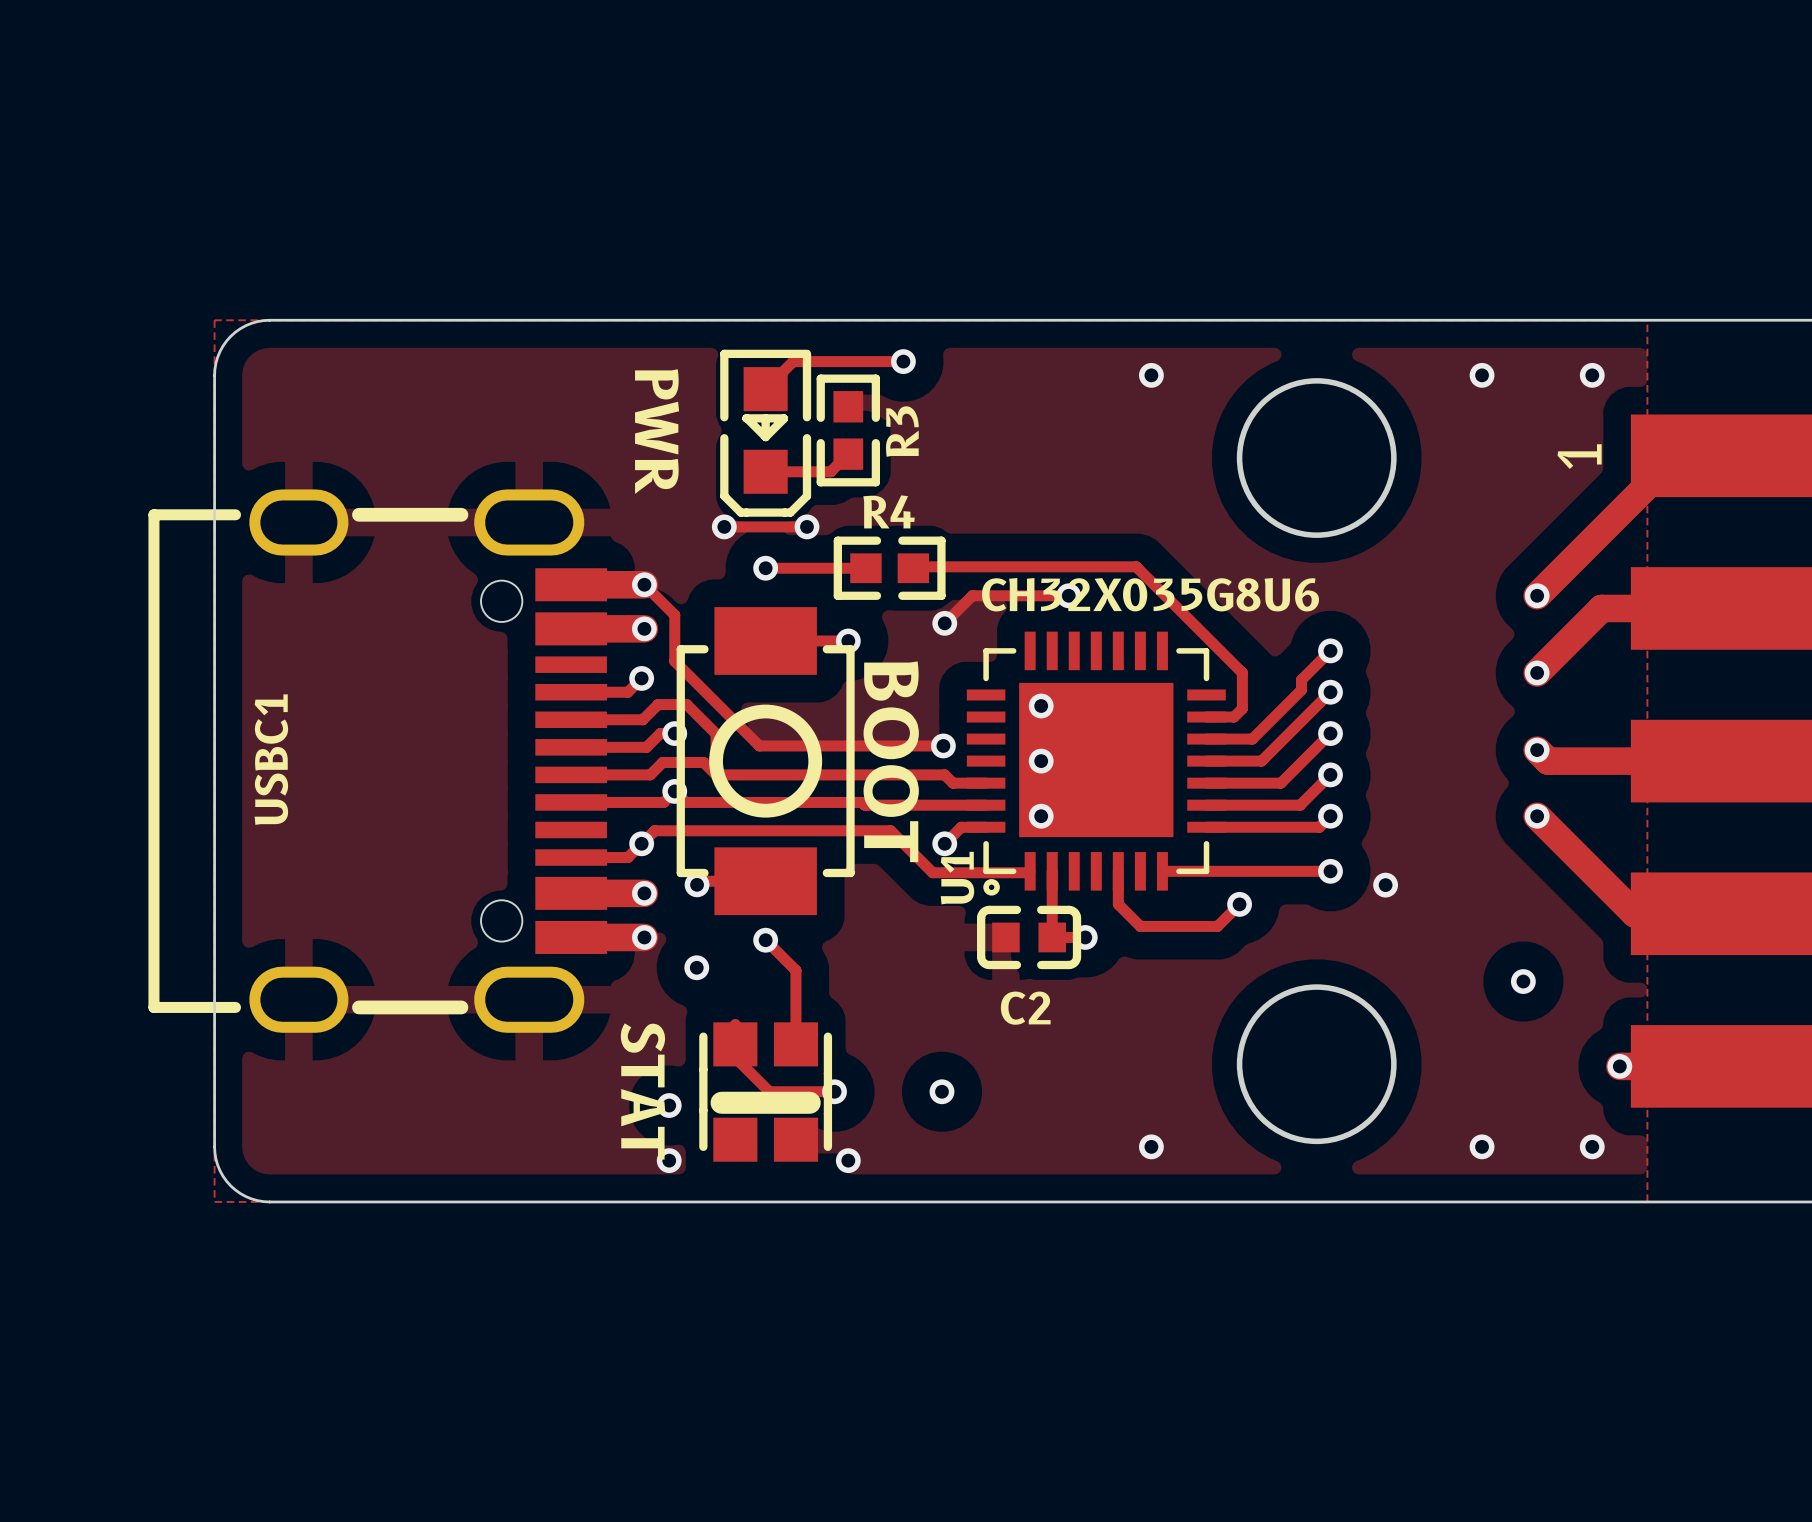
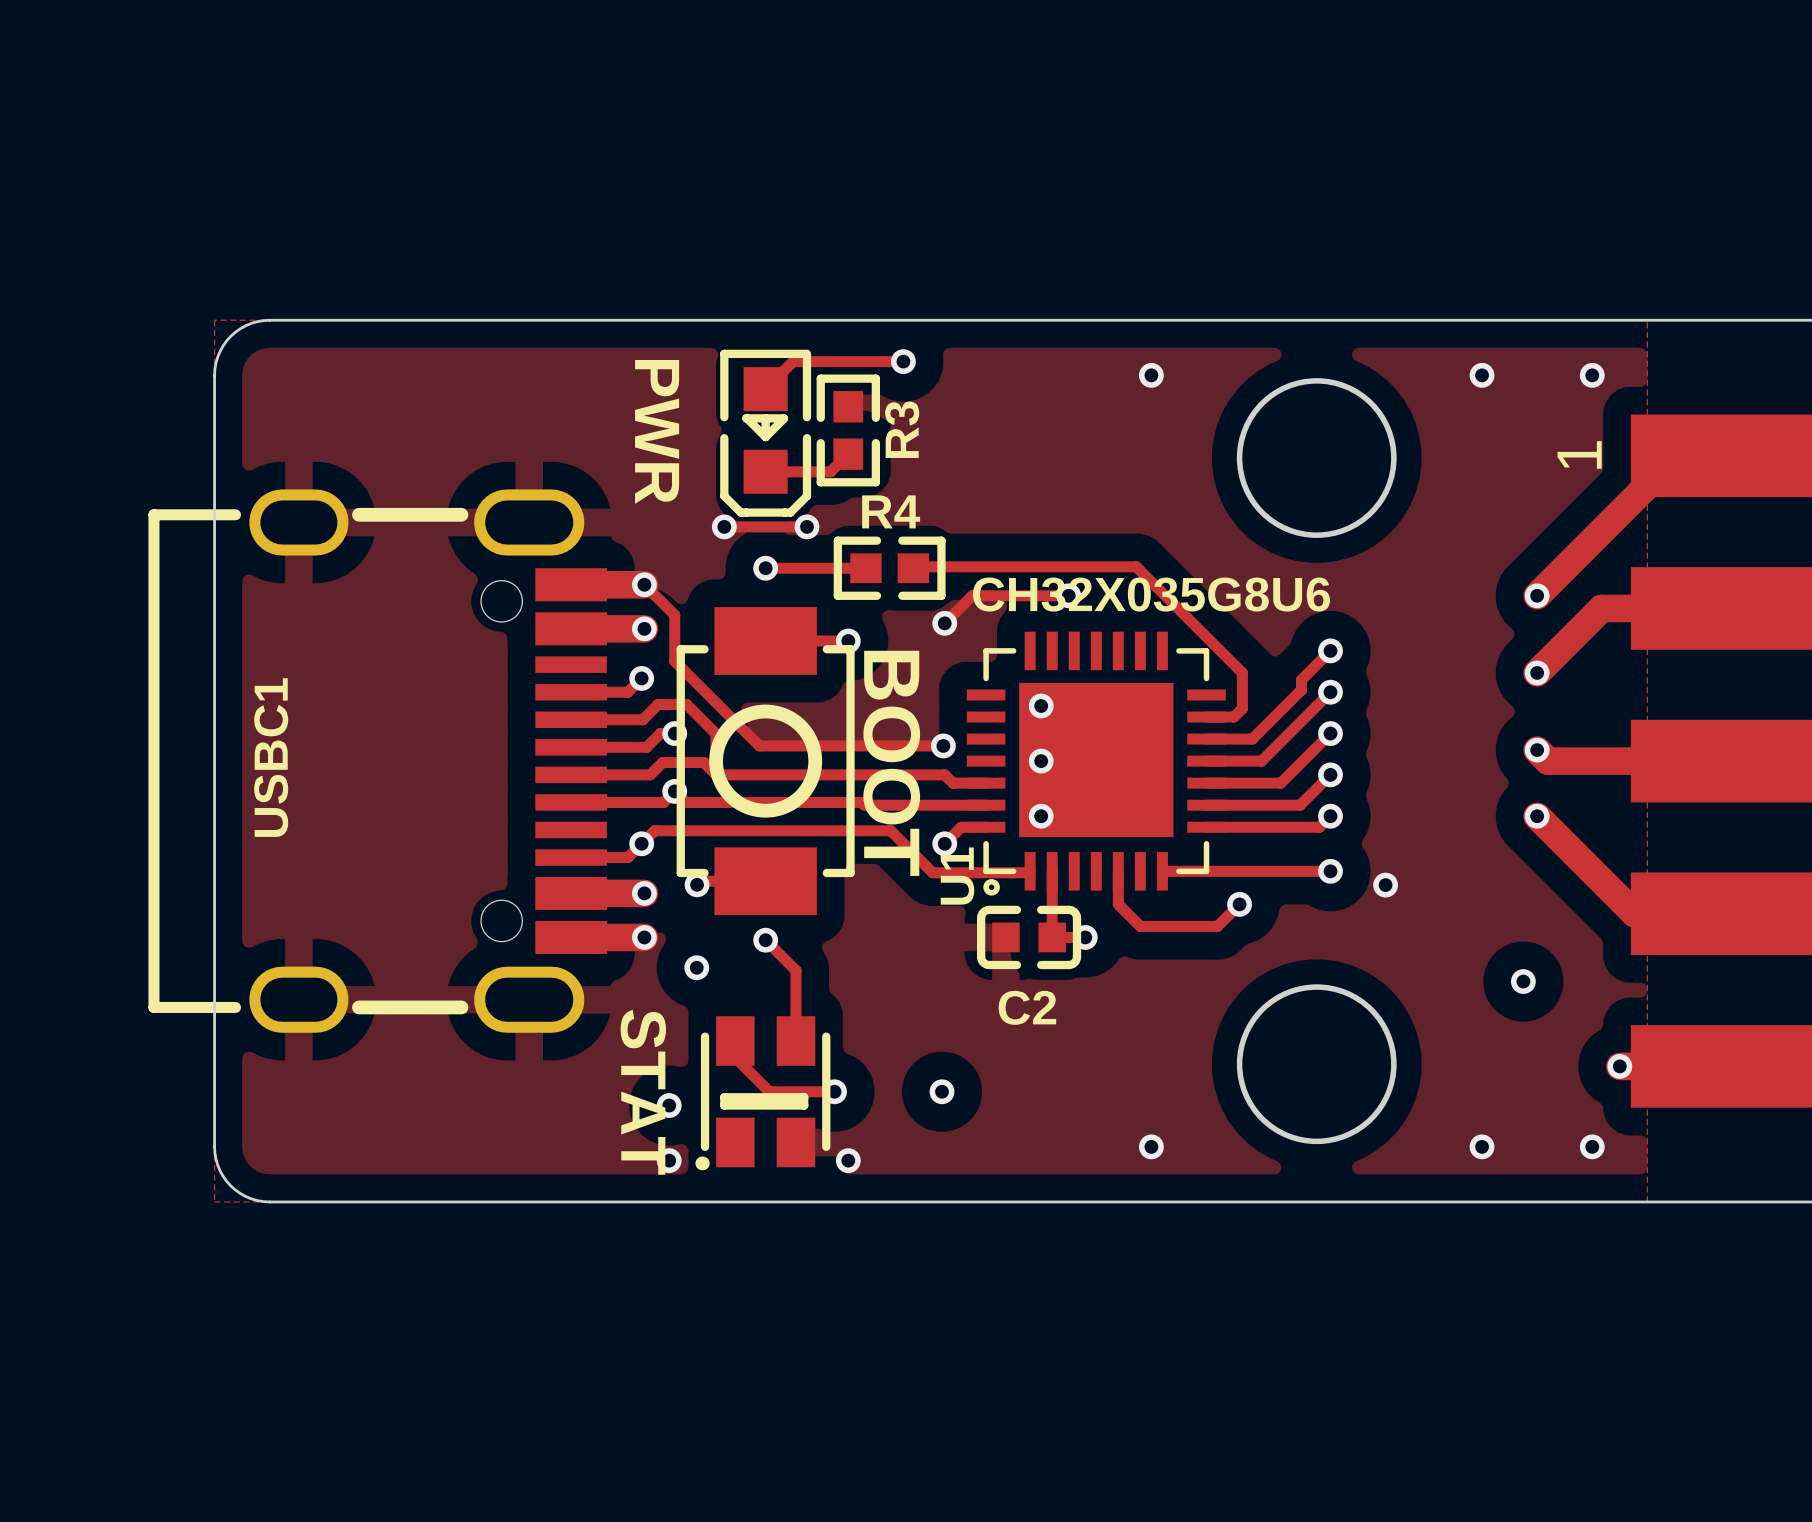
part footprint: [699, 1022, 833, 1162] -> [695, 1016, 831, 1171]

